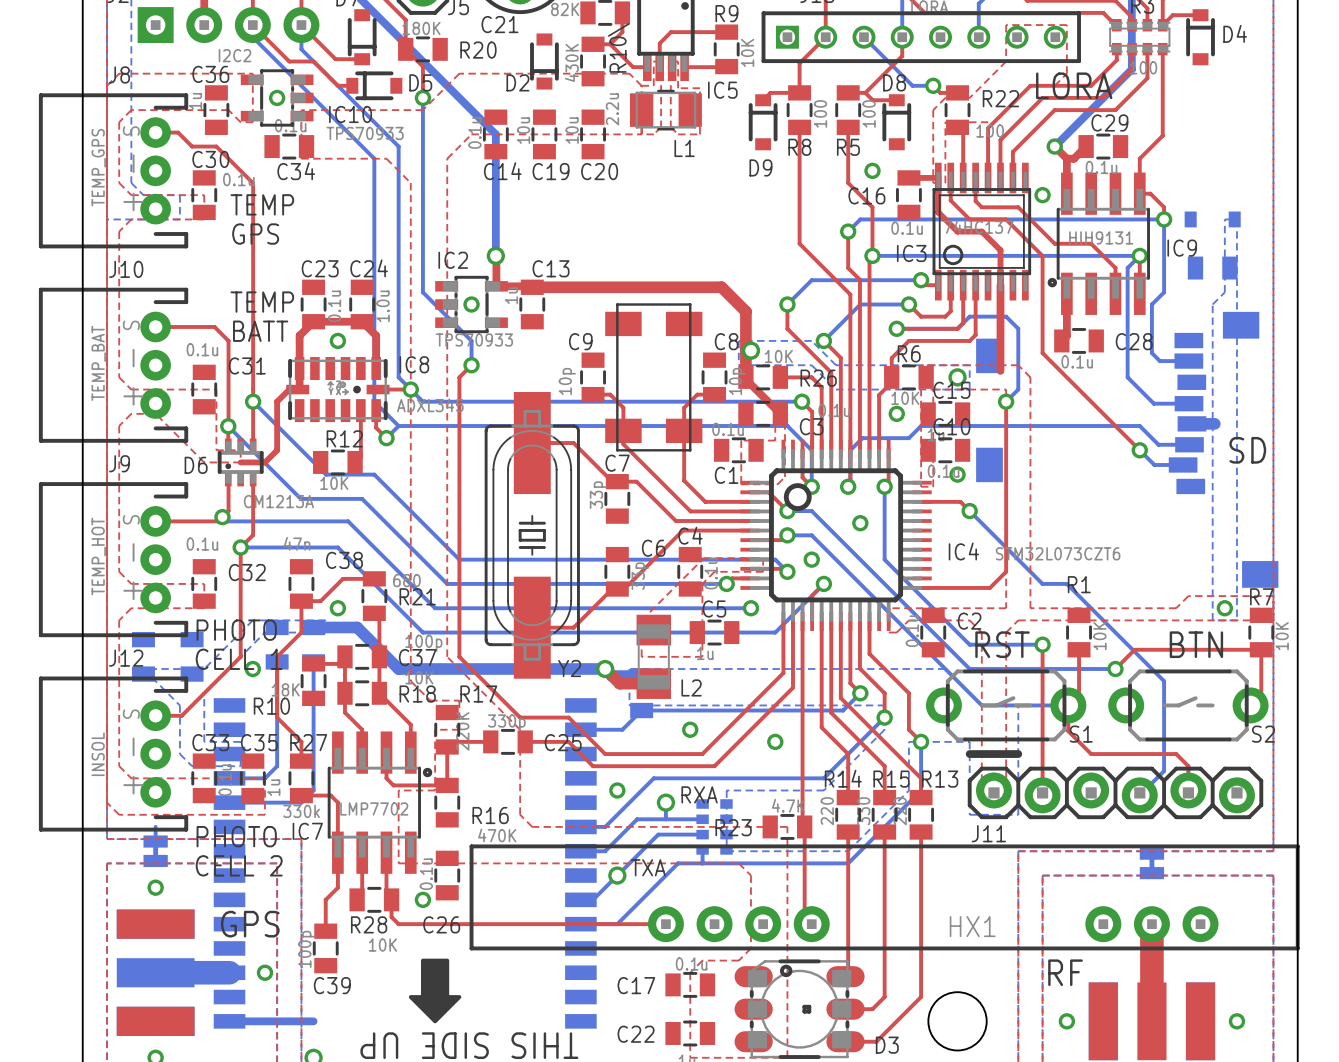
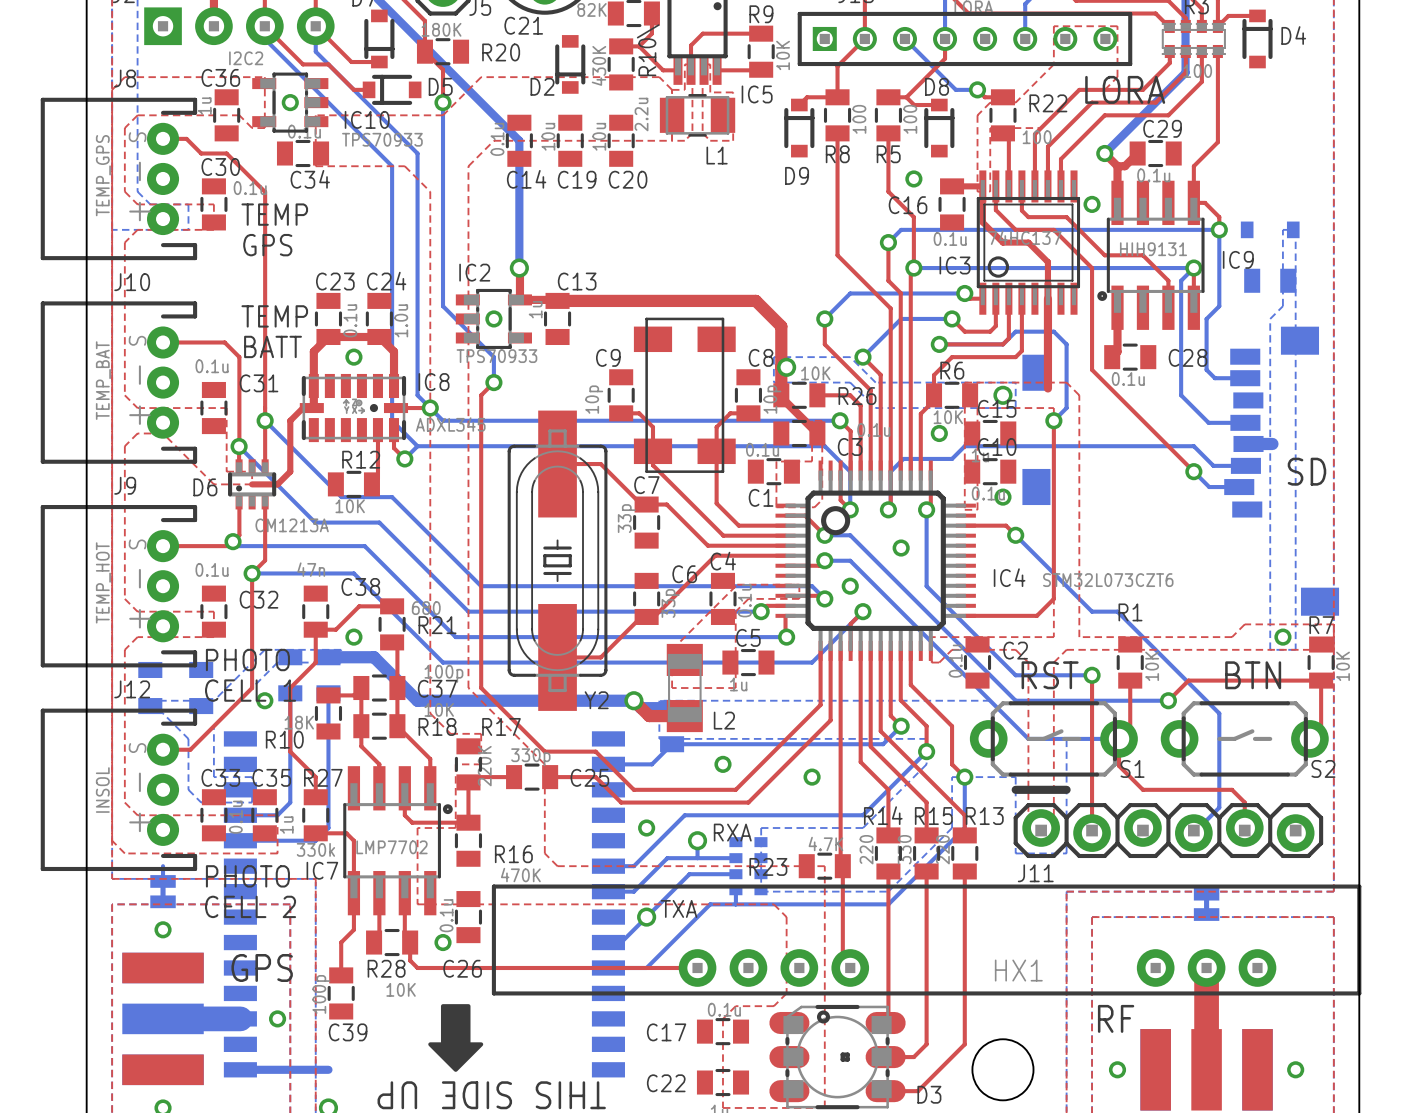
top track: none -> (785, 615) (785, 636)

